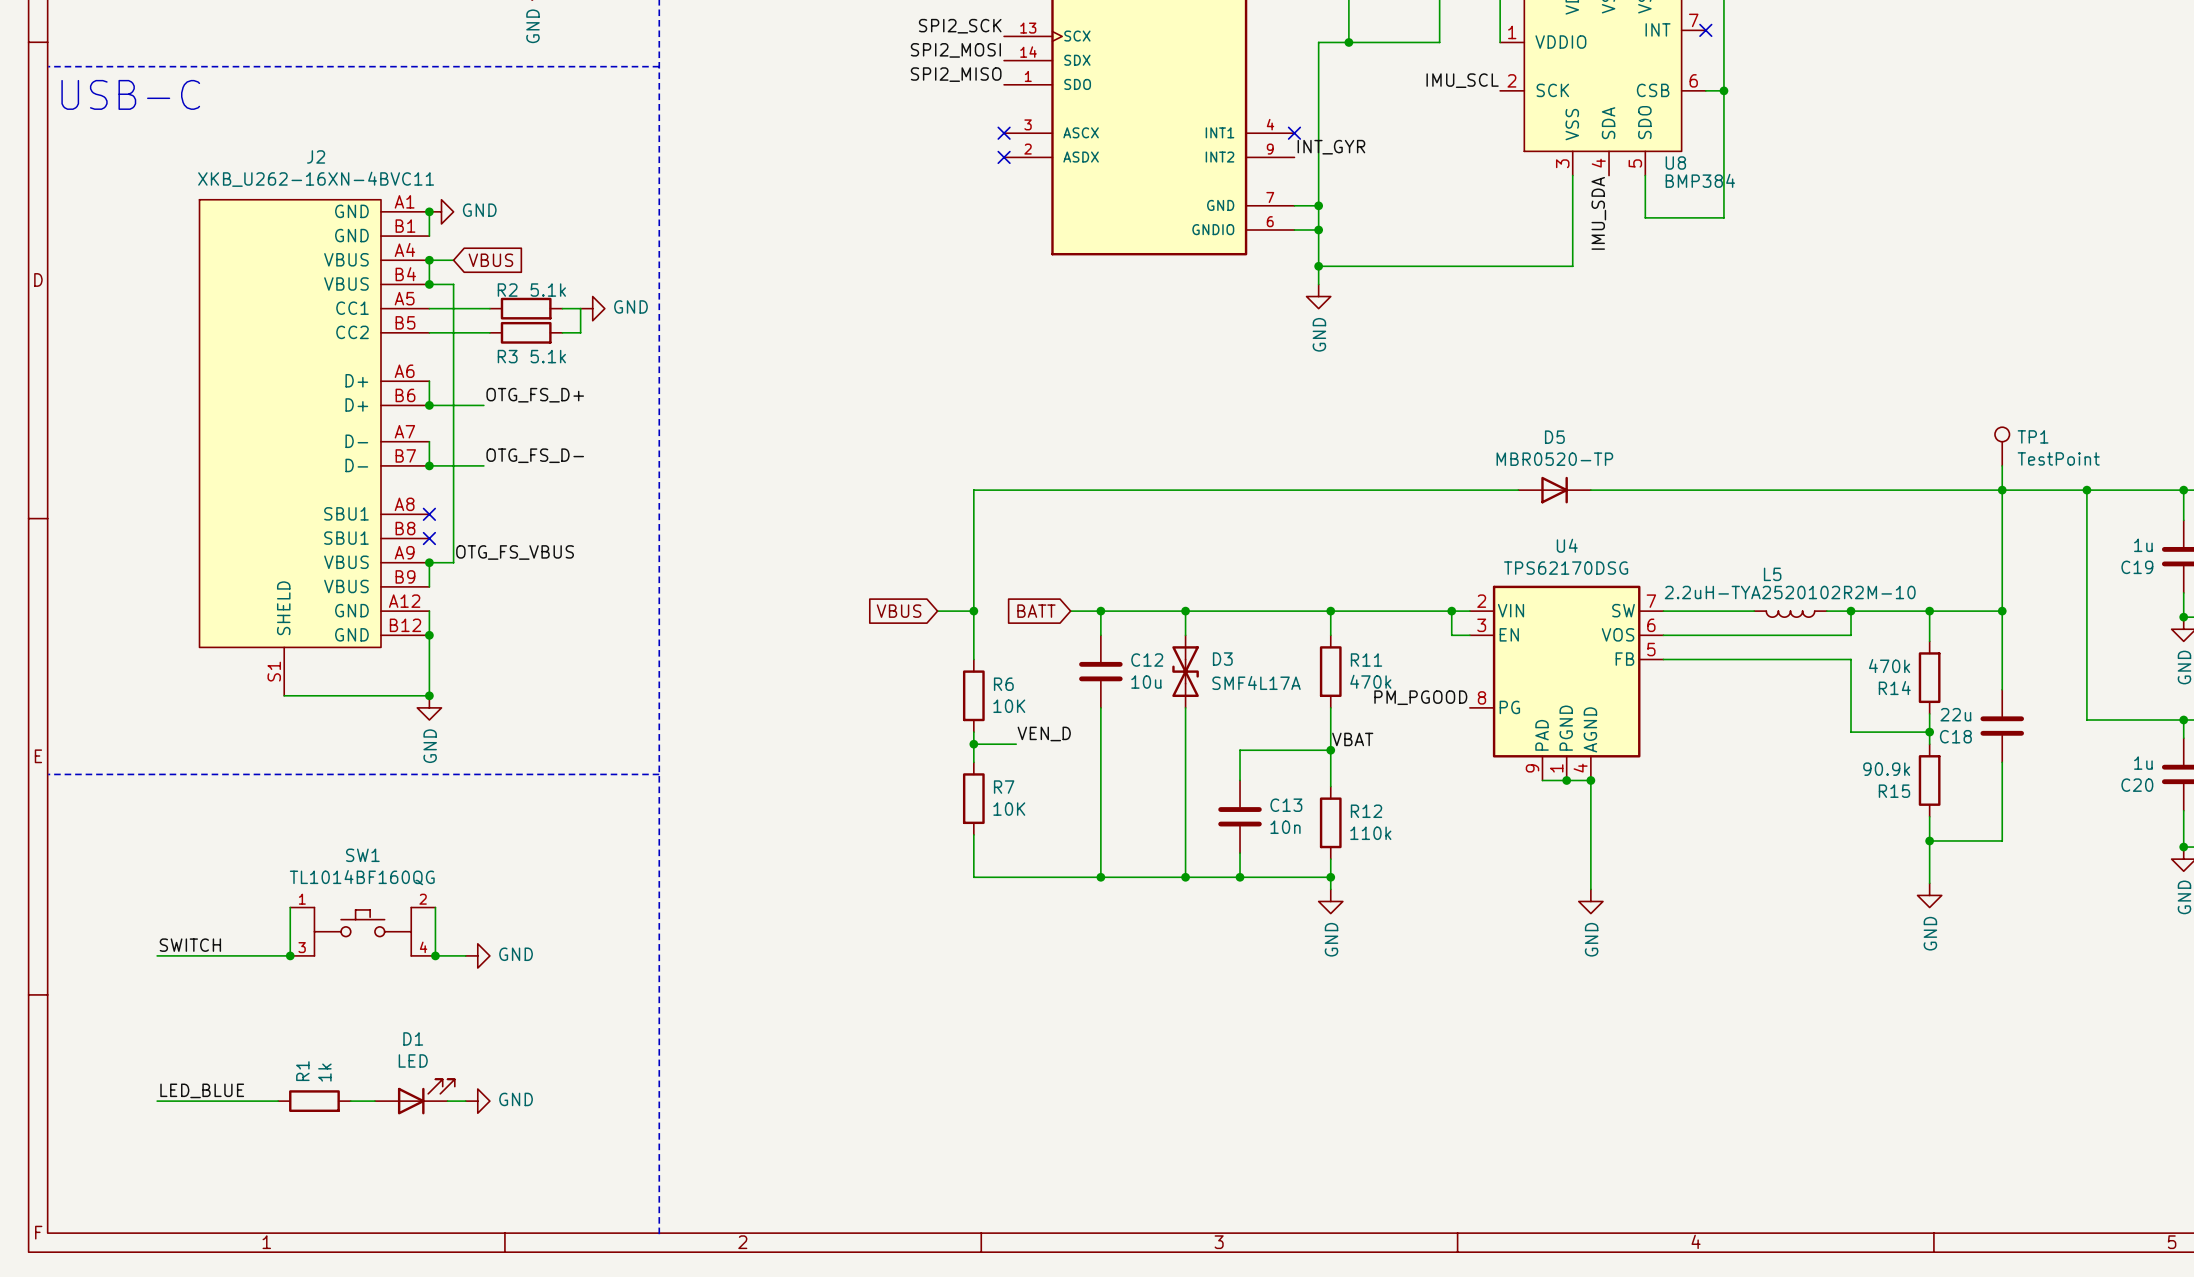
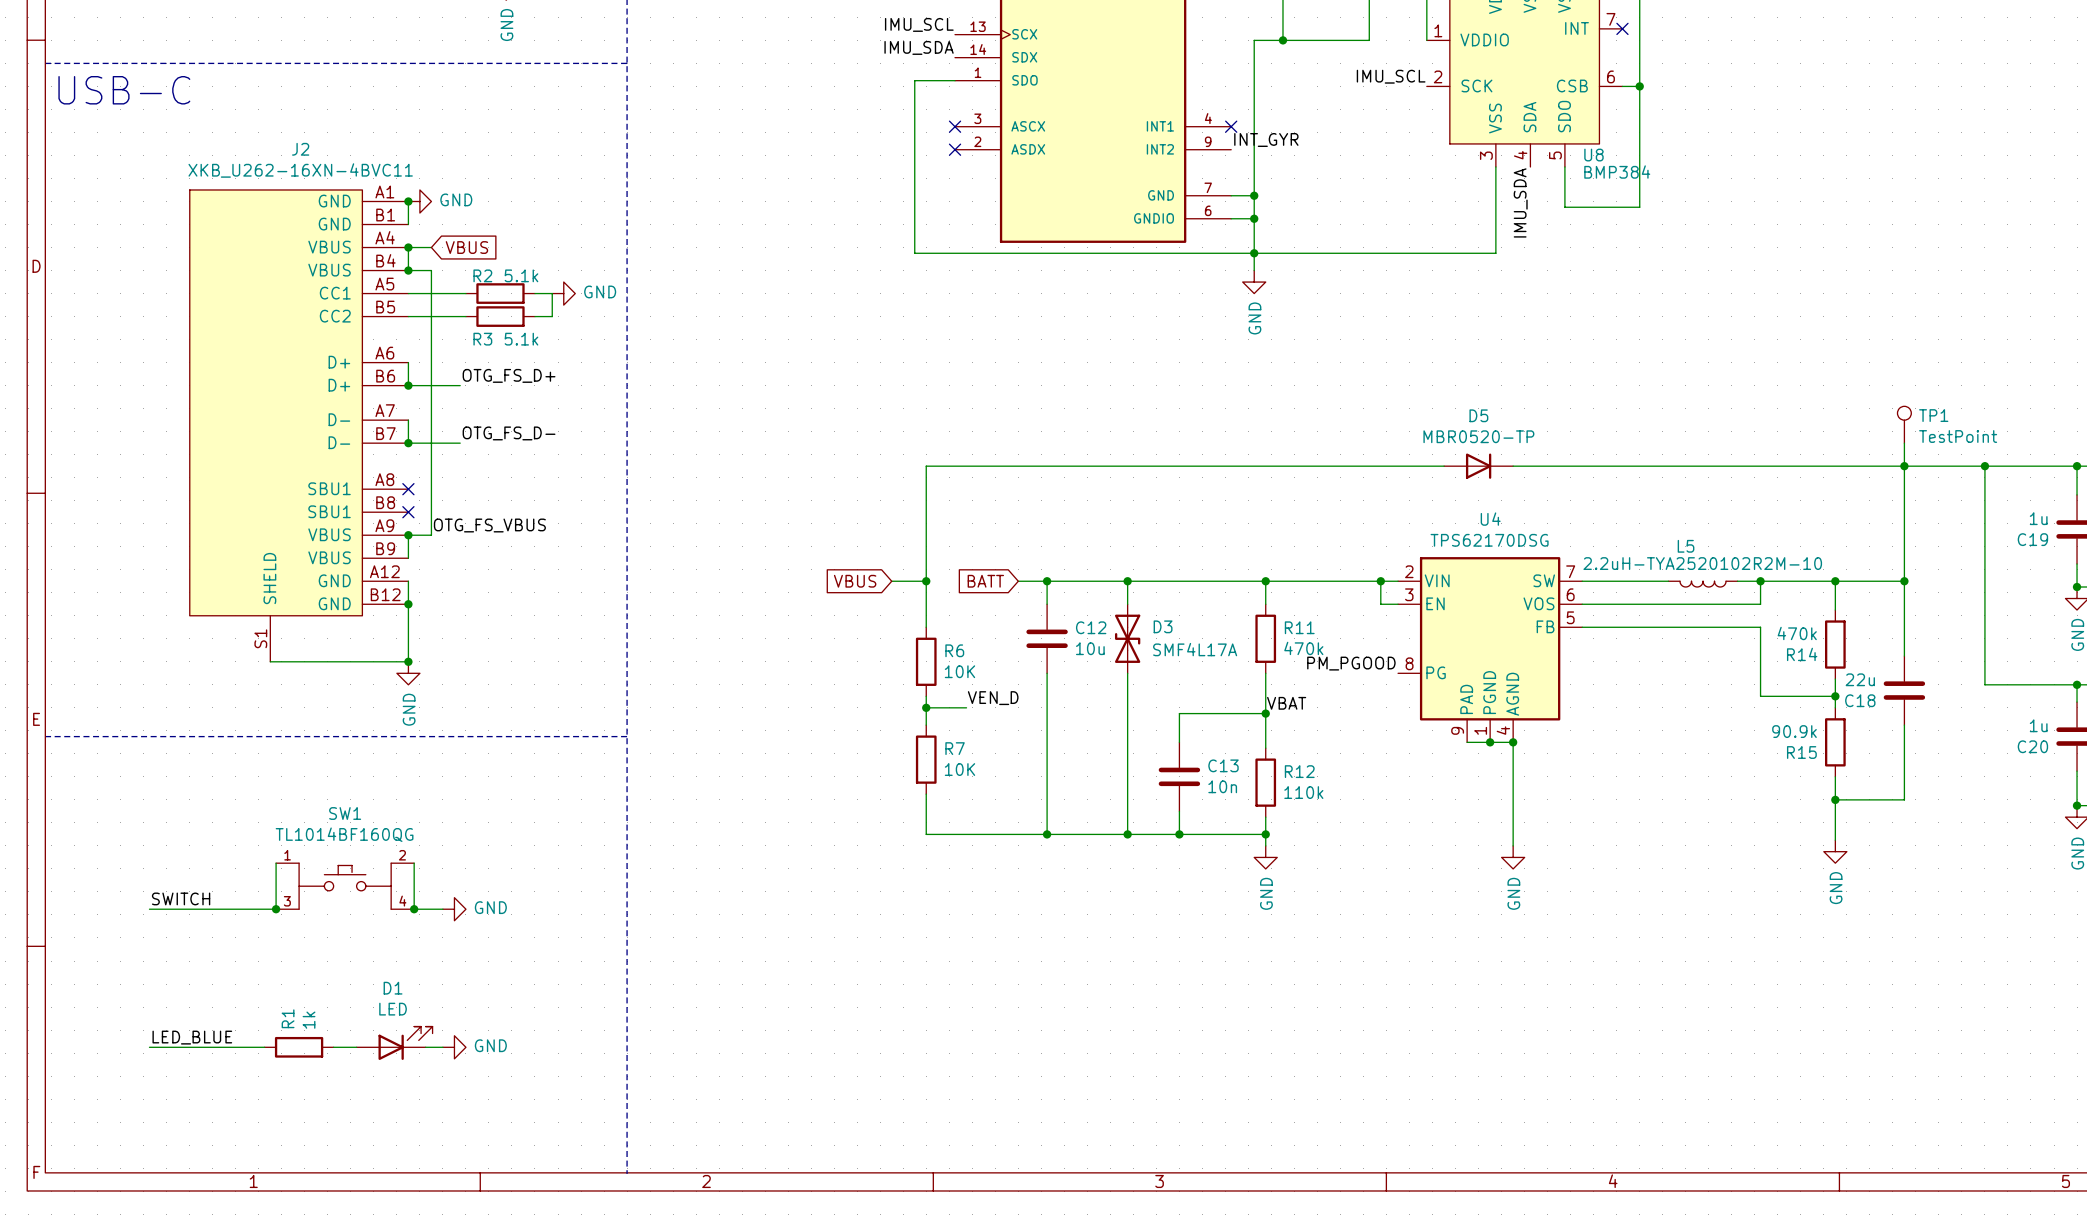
label: SPI2_SCK (960, 26) -> IMU_SCL (919, 24)
label: SPI2_MOSI (955, 50) -> IMU_SDA (919, 47)
label: SPI2_MISO (956, 74) -> none
wire: none -> (955, 80) (914, 80) (914, 253) (1254, 253)

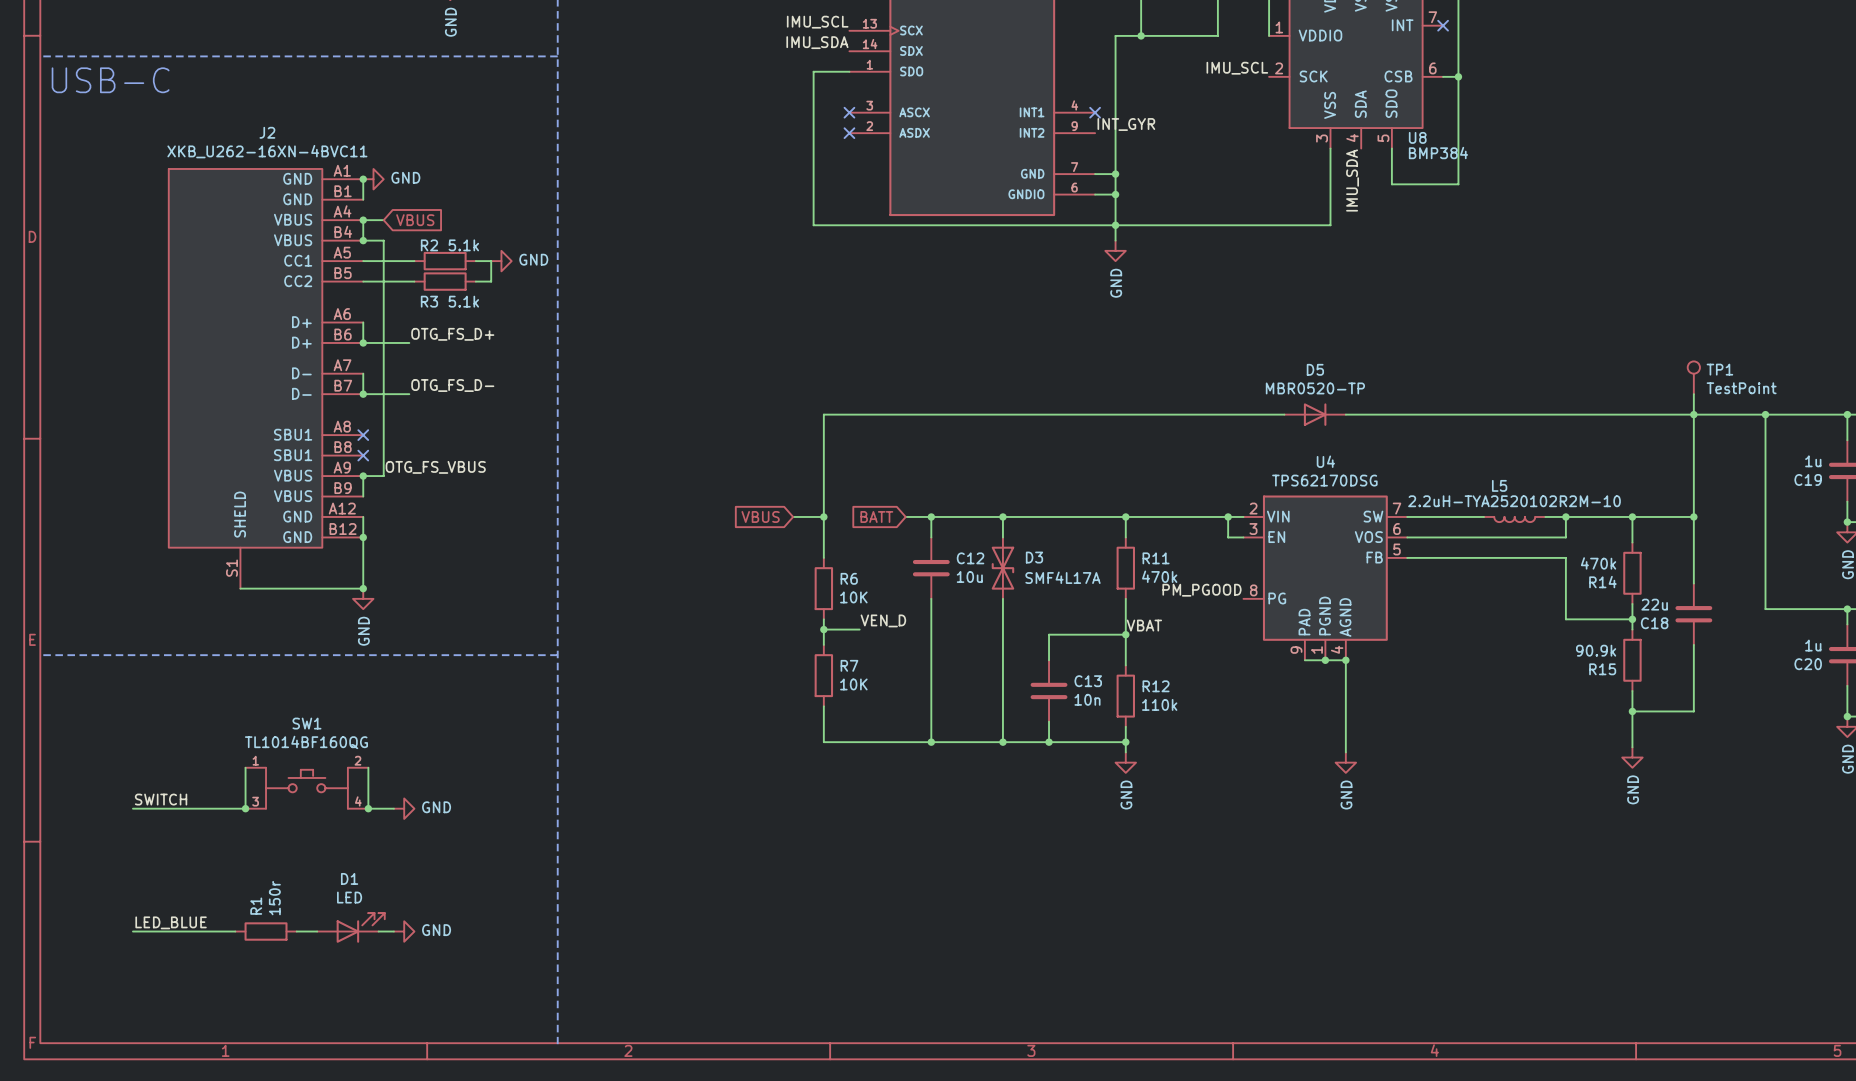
R1 value: 1k (309, 1020) -> 150r (274, 898)

